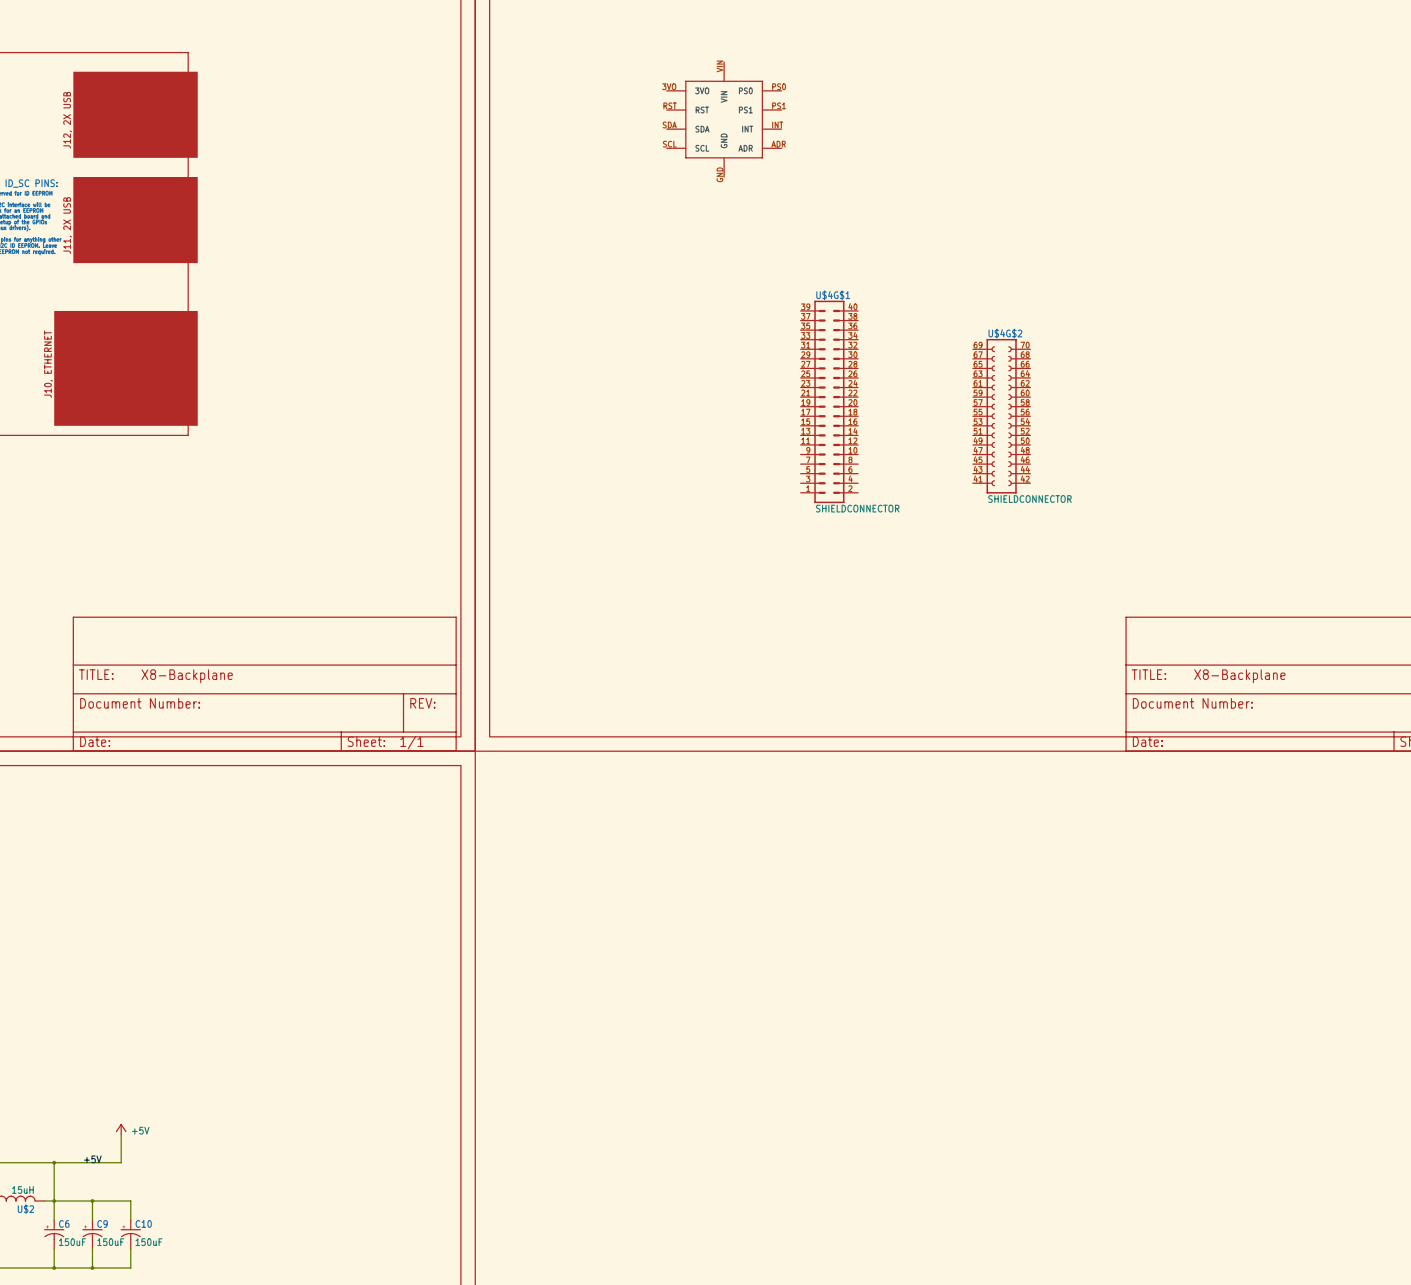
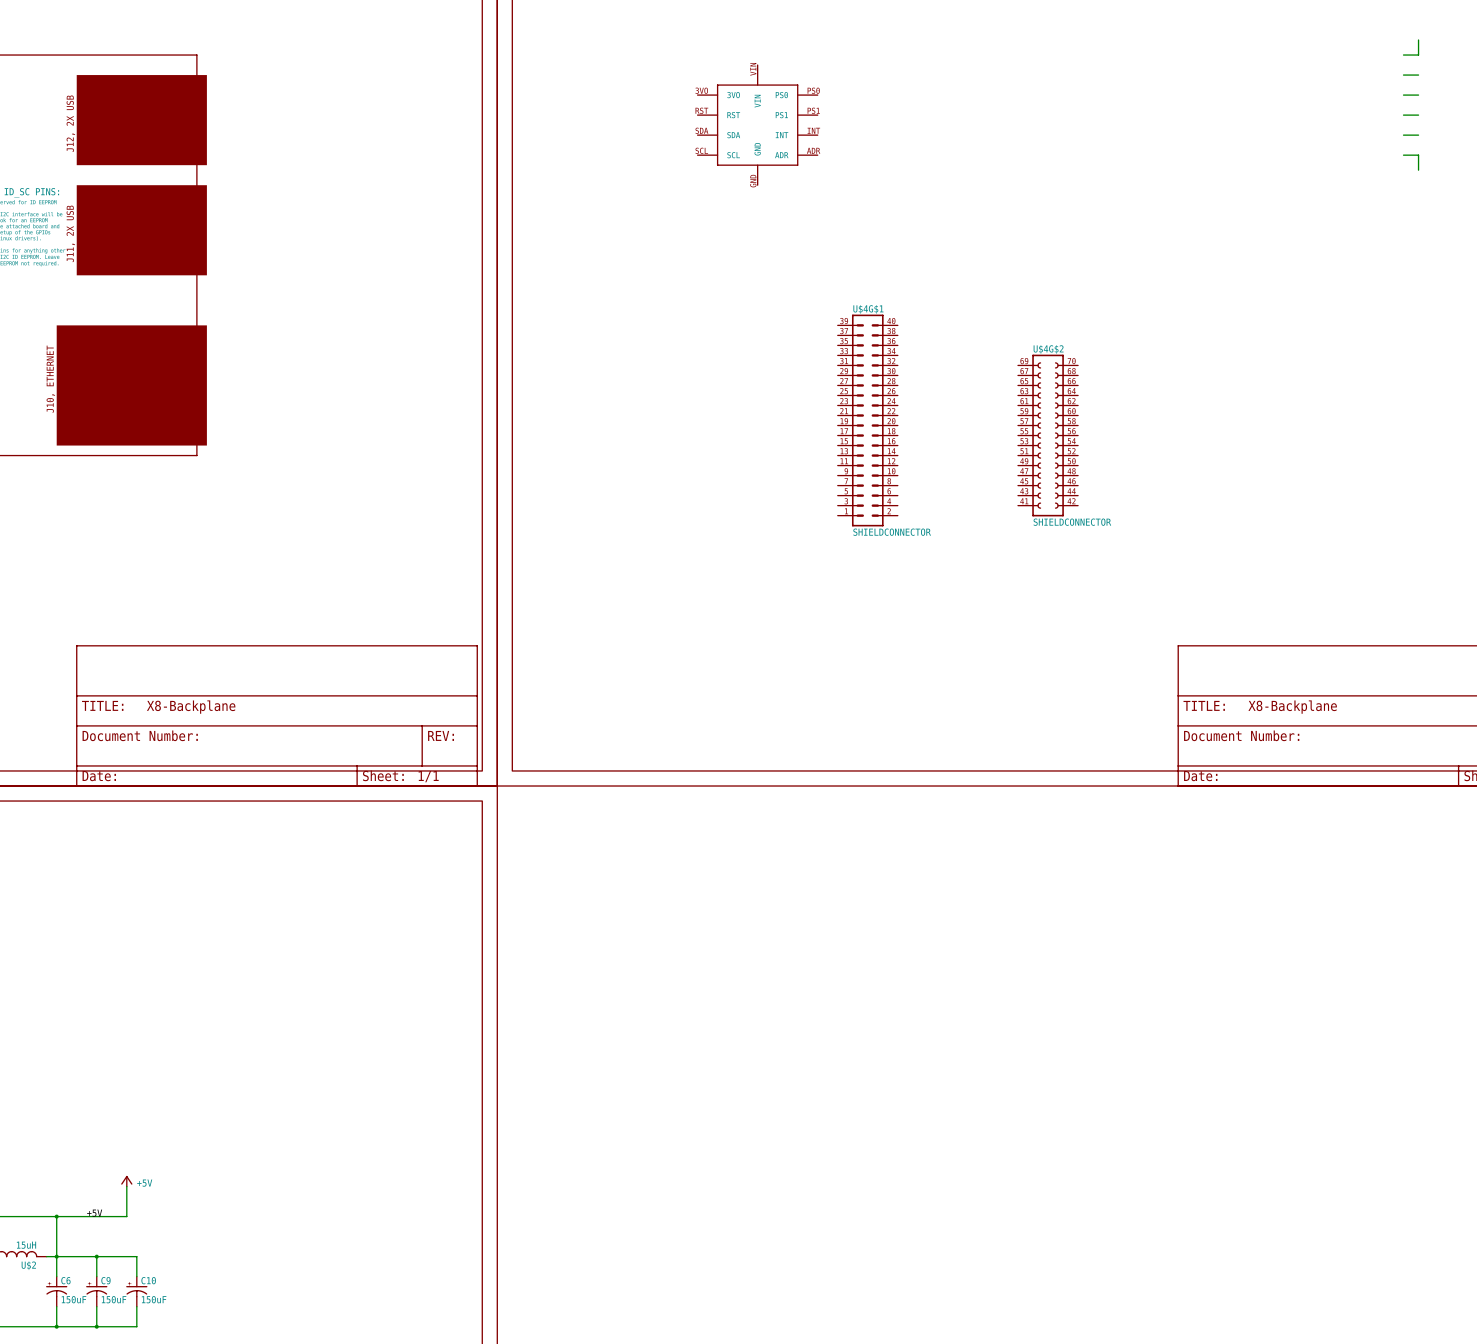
wire: none -> (1418, 40) (1418, 55) (1403, 55)
wire: none -> (1403, 75) (1418, 75)
wire: none -> (1403, 95) (1418, 95)
wire: none -> (1403, 115) (1418, 115)
wire: none -> (1403, 135) (1418, 135)
wire: none -> (1403, 155) (1418, 155) (1418, 170)

